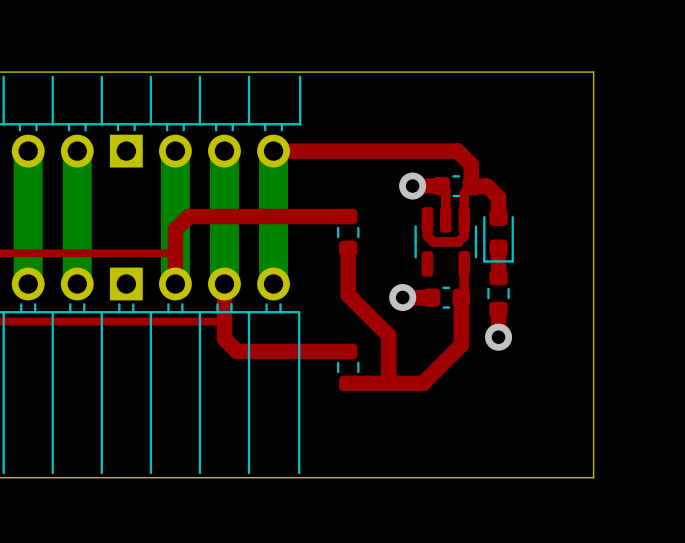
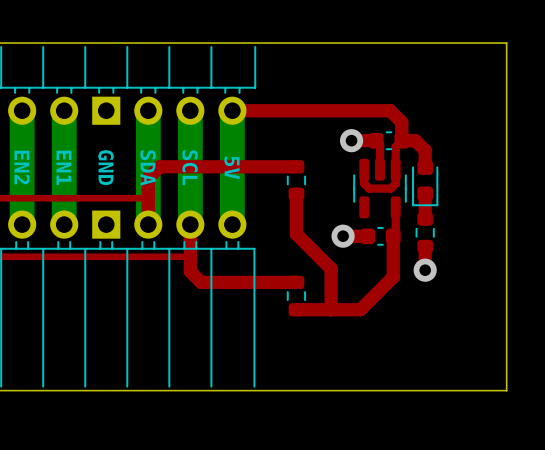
text: none -> EN2 (22, 167)
text: none -> EN1 (63, 167)
text: none -> GND (105, 167)
text: none -> SDA (148, 167)
text: none -> SCL (190, 167)
text: none -> 5V (231, 167)

